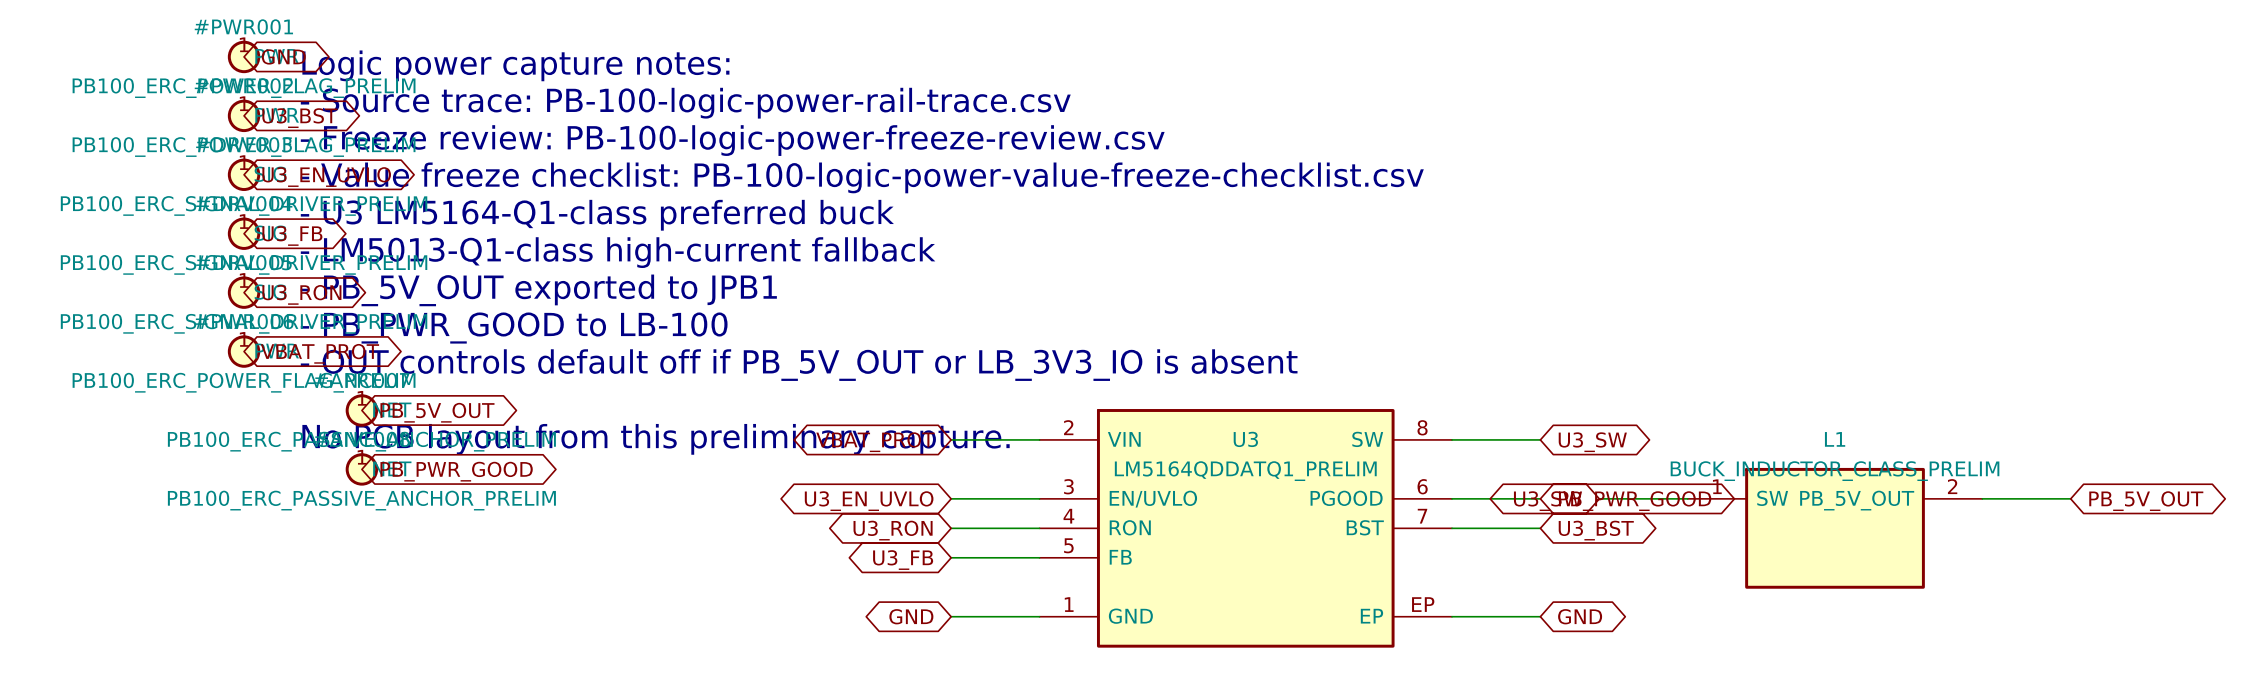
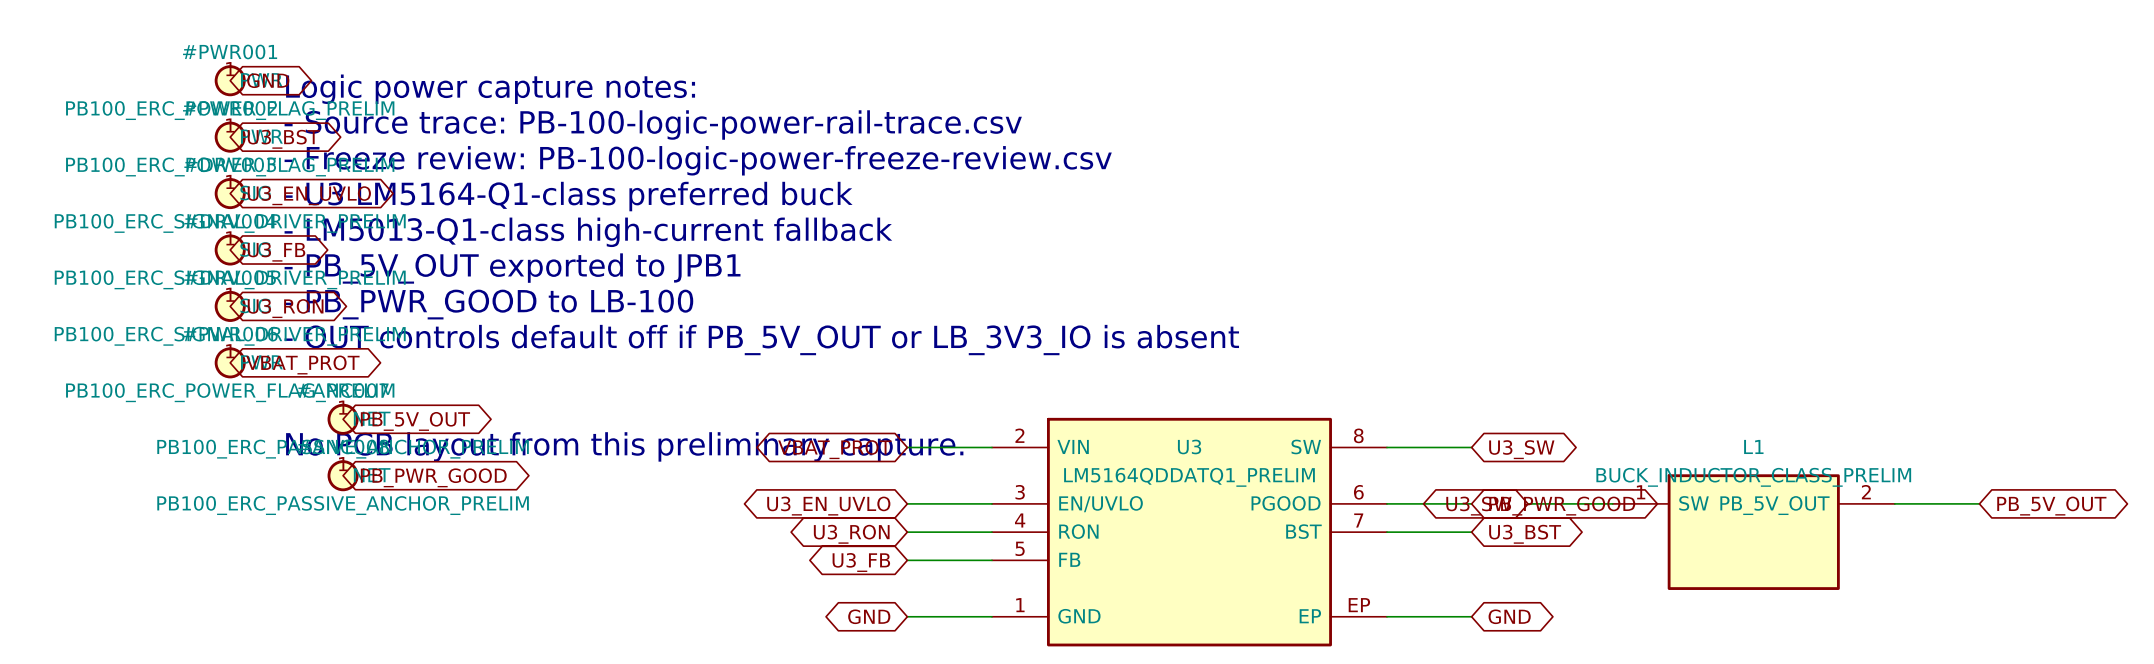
text: - Value freeze checklist: PB-100-logic-power-value-freeze-checklist.csv (862, 177) -> - U3 LM5164-Q1-class preferred buck (568, 196)
text: - U3 LM5164-Q1-class preferred buck (597, 215) -> - LM5013-Q1-class high-current fallback (588, 232)
text: - LM5013-Q1-class high-current fallback (618, 252) -> - PB_5V_OUT exported to JPB1 (512, 268)
text: - PB_5V_OUT exported to JPB1 (538, 290) -> - PB_PWR_GOOD to LB-100 (488, 304)
text: - PB_PWR_GOOD to LB-100 (514, 328) -> - OUT controls default off if PB_5V_OUT or LB_3V3_IO is absent (761, 340)
text: - OUT controls default off if PB_5V_OUT or LB_3V3_IO is absent (799, 365) -> none

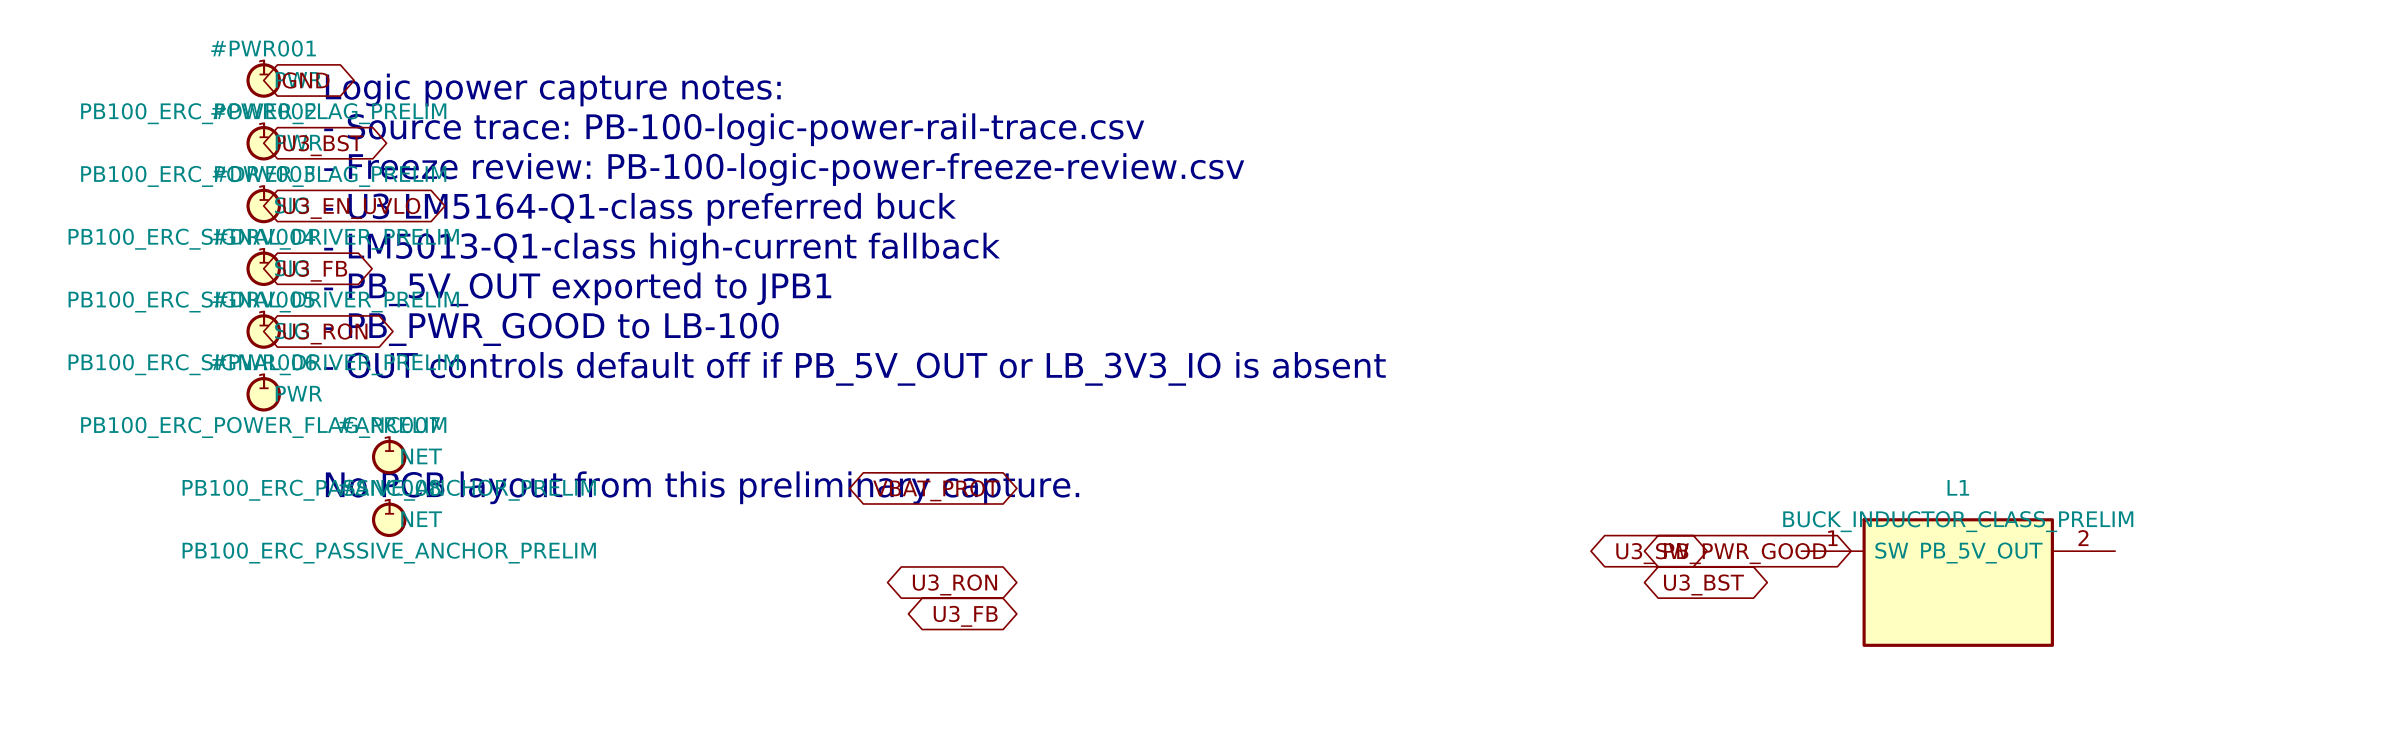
global label: VBAT_PROT (302, 365) -> none
global label: PB_5V_OUT (415, 421) -> none
wire: (907, 447) (991, 447) -> none
wire: (1386, 447) (1471, 447) -> none
global label: U3_SW (1521, 449) -> none
global label: PB_PWR_GOOD (433, 477) -> none
wire: (907, 503) (991, 503) -> none
wire: (1386, 503) (1471, 503) -> none
wire: (1528, 503) (1612, 503) -> none
wire: (1894, 503) (1979, 503) -> none
global label: U3_EN_UVLO (828, 506) -> none
global label: PB_5V_OUT (2051, 506) -> none
wire: (907, 532) (991, 532) -> none
U3: LM5164QDDATQ1_PRELIM (1189, 532) -> none
wire: (1386, 532) (1471, 532) -> none
wire: (907, 560) (991, 560) -> none
global label: GND (869, 616) -> none
wire: (907, 616) (991, 616) -> none
wire: (1386, 616) (1471, 616) -> none
global label: GND (1509, 616) -> none

